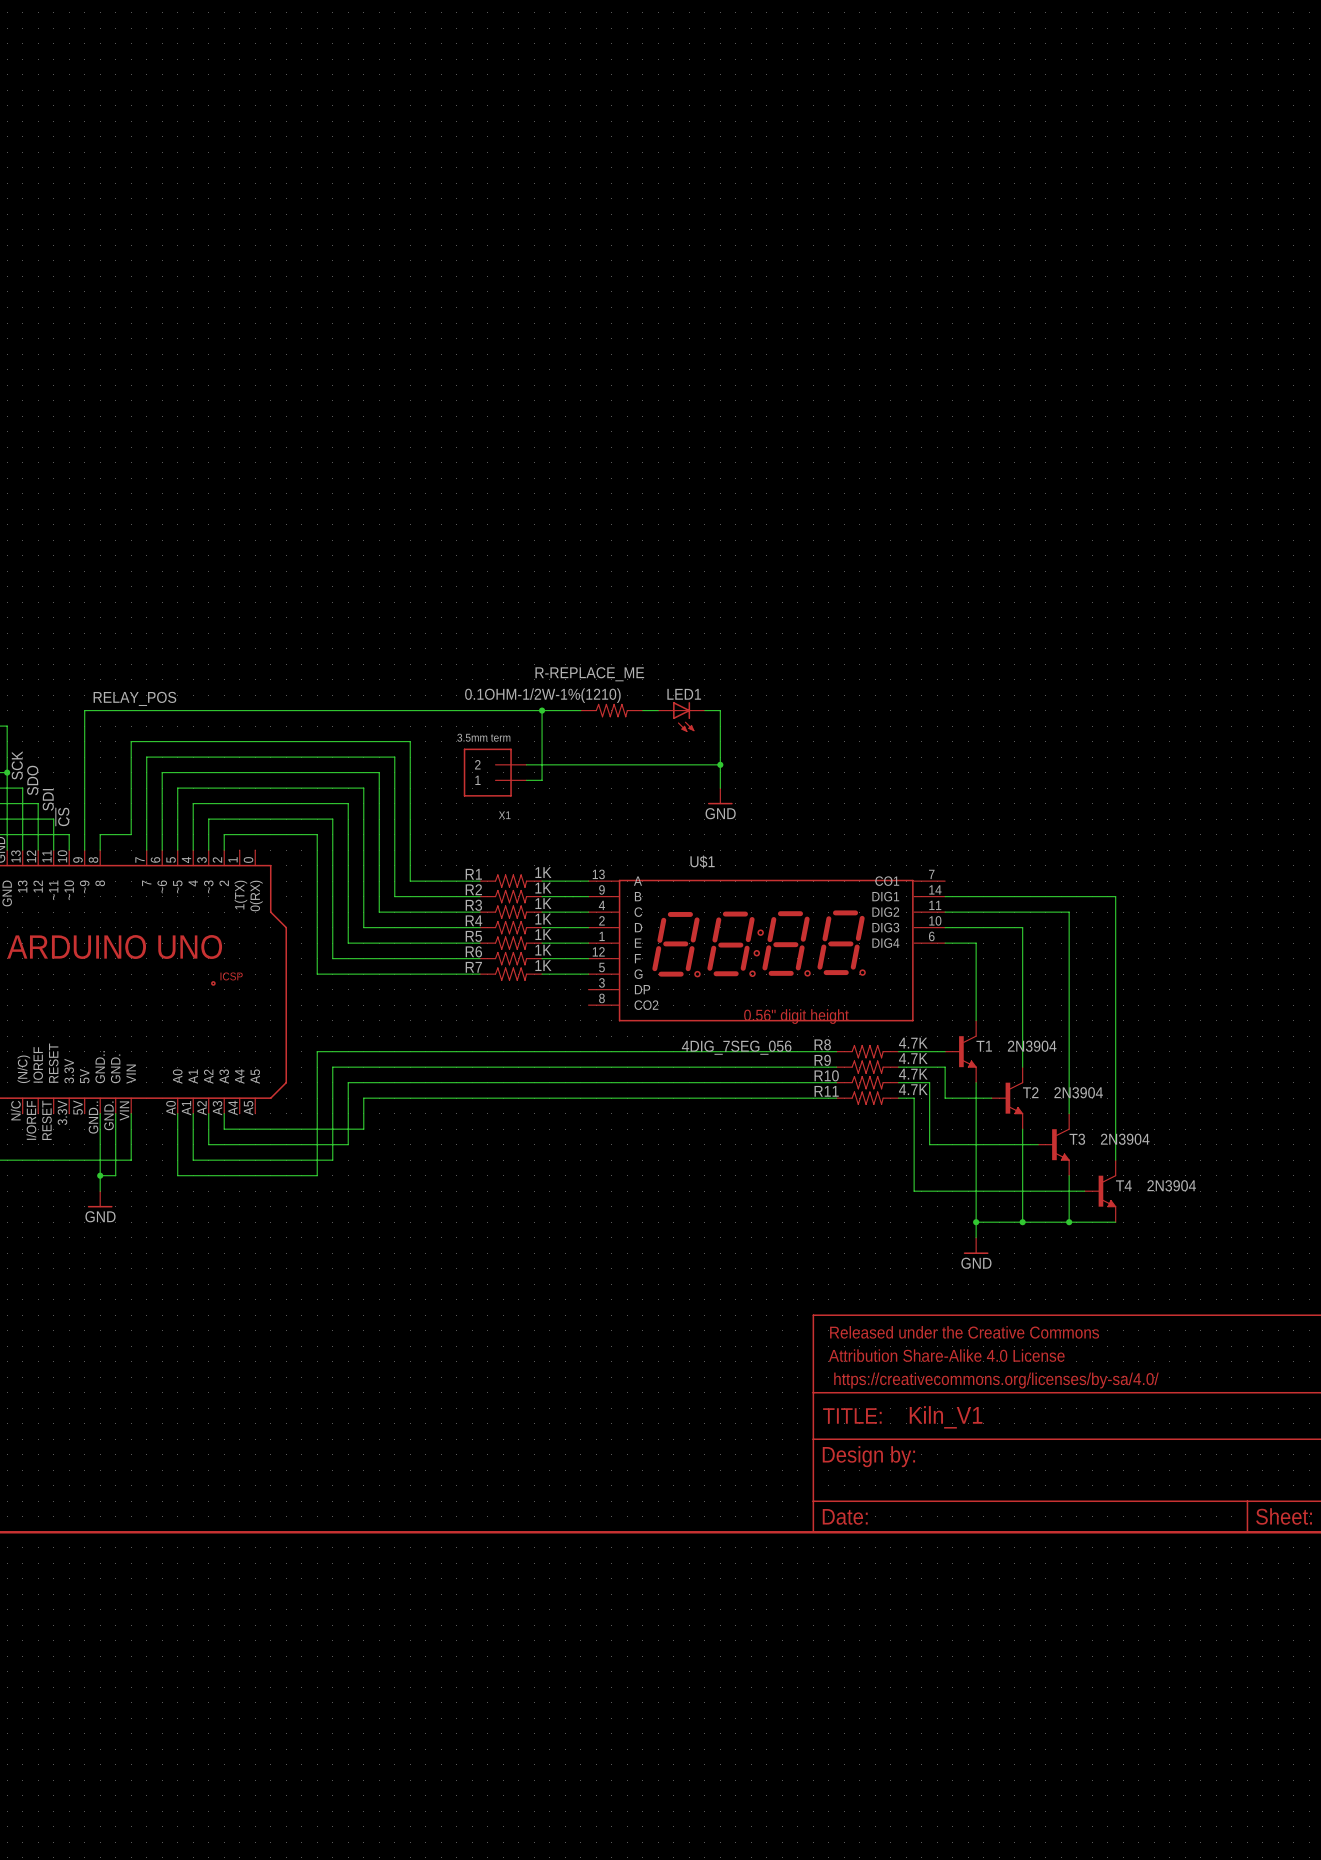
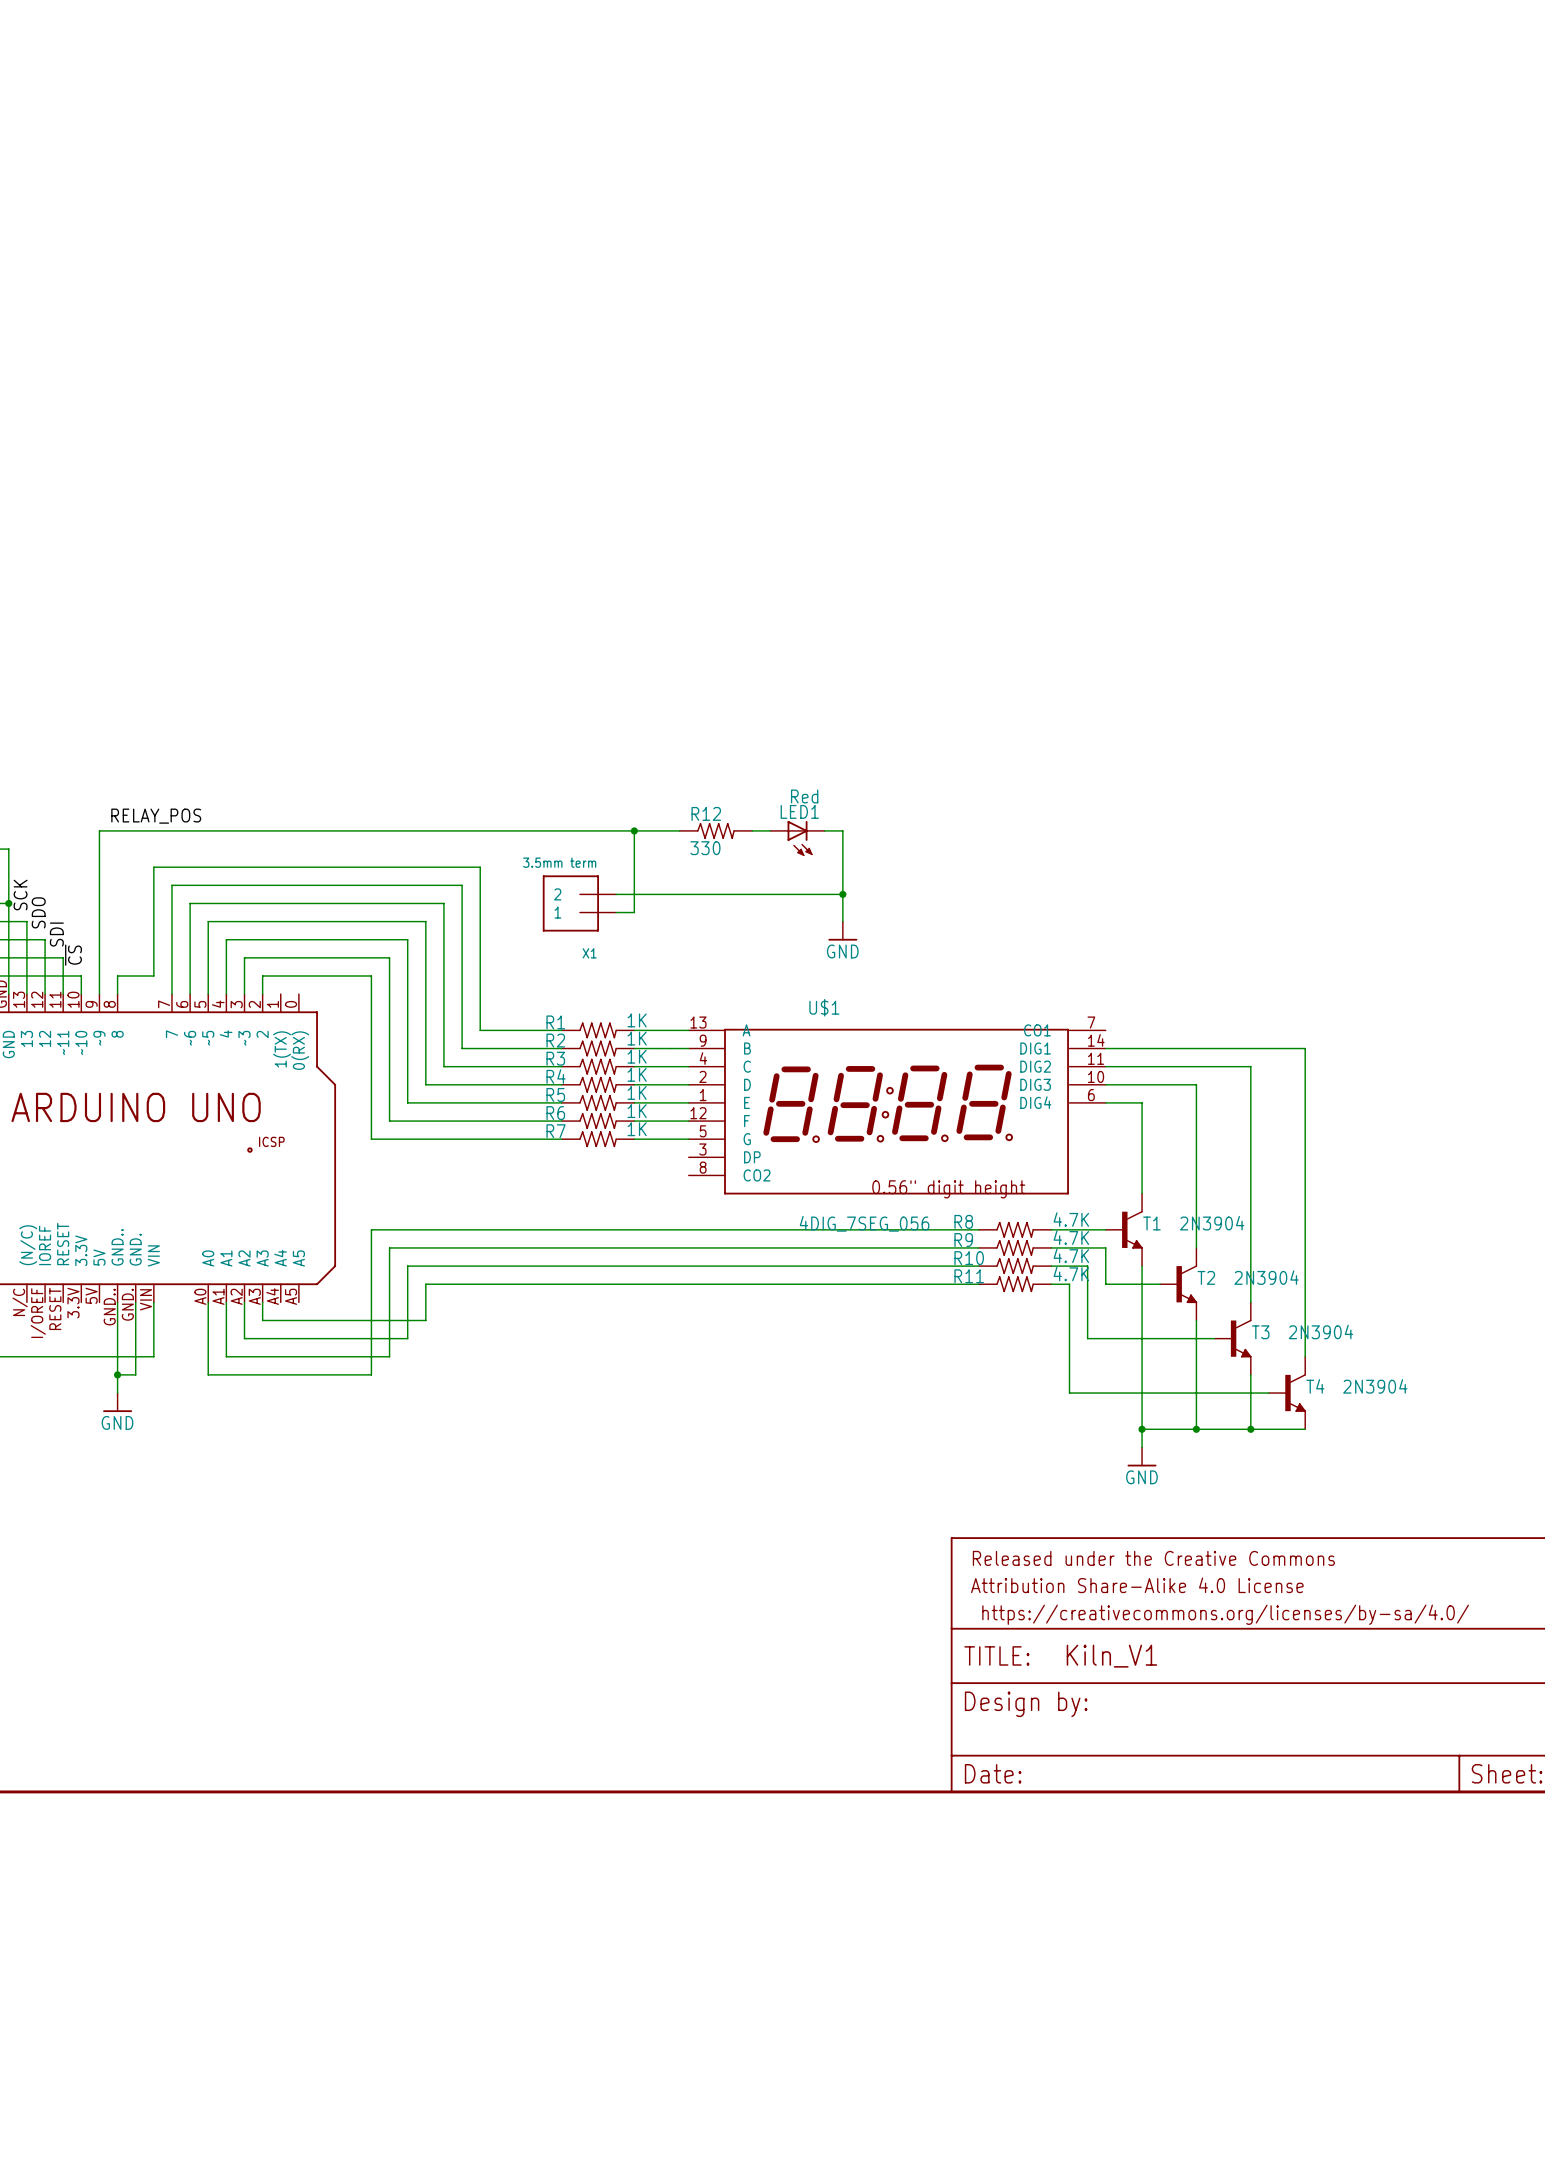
R-REPLACE_ME name: R-REPLACE_ME (589, 674) -> R12 (706, 813)
LED1 value: none -> Red (804, 796)
R-REPLACE_ME value: 0.1OHM-1/2W-1%(1210) (542, 695) -> 330 (705, 848)

